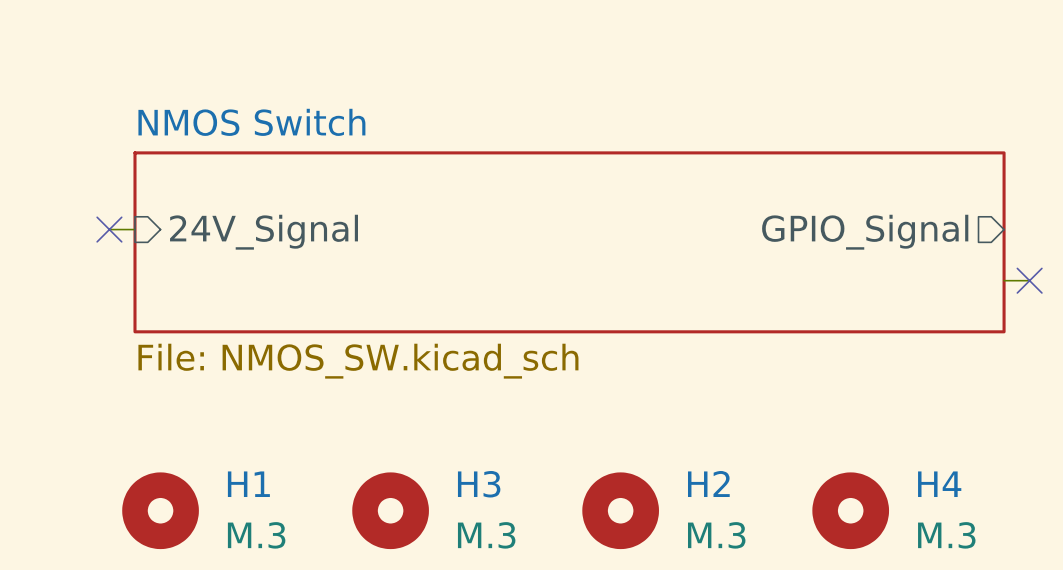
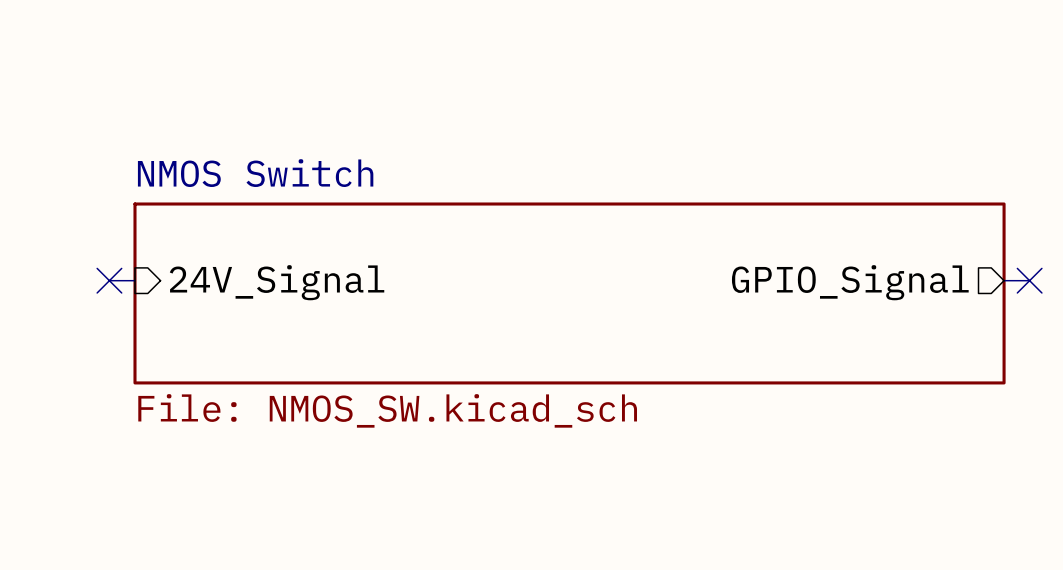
wire: (109, 229) (134, 229) -> (109, 280) (134, 280)
no-connect mark position: (109, 229) -> (109, 280)
sheet pin position: 24V_Signal (264, 232) -> 24V_Signal (277, 282)
sheet pin position: GPIO_Signal (865, 232) -> GPIO_Signal (850, 282)
sheet NMOS Switch position: (569, 242) -> (569, 293)
H1: M.3 (160, 510) -> none
H3: M.3 (390, 510) -> none
H2: M.3 (620, 510) -> none
H4: M.3 (850, 510) -> none

